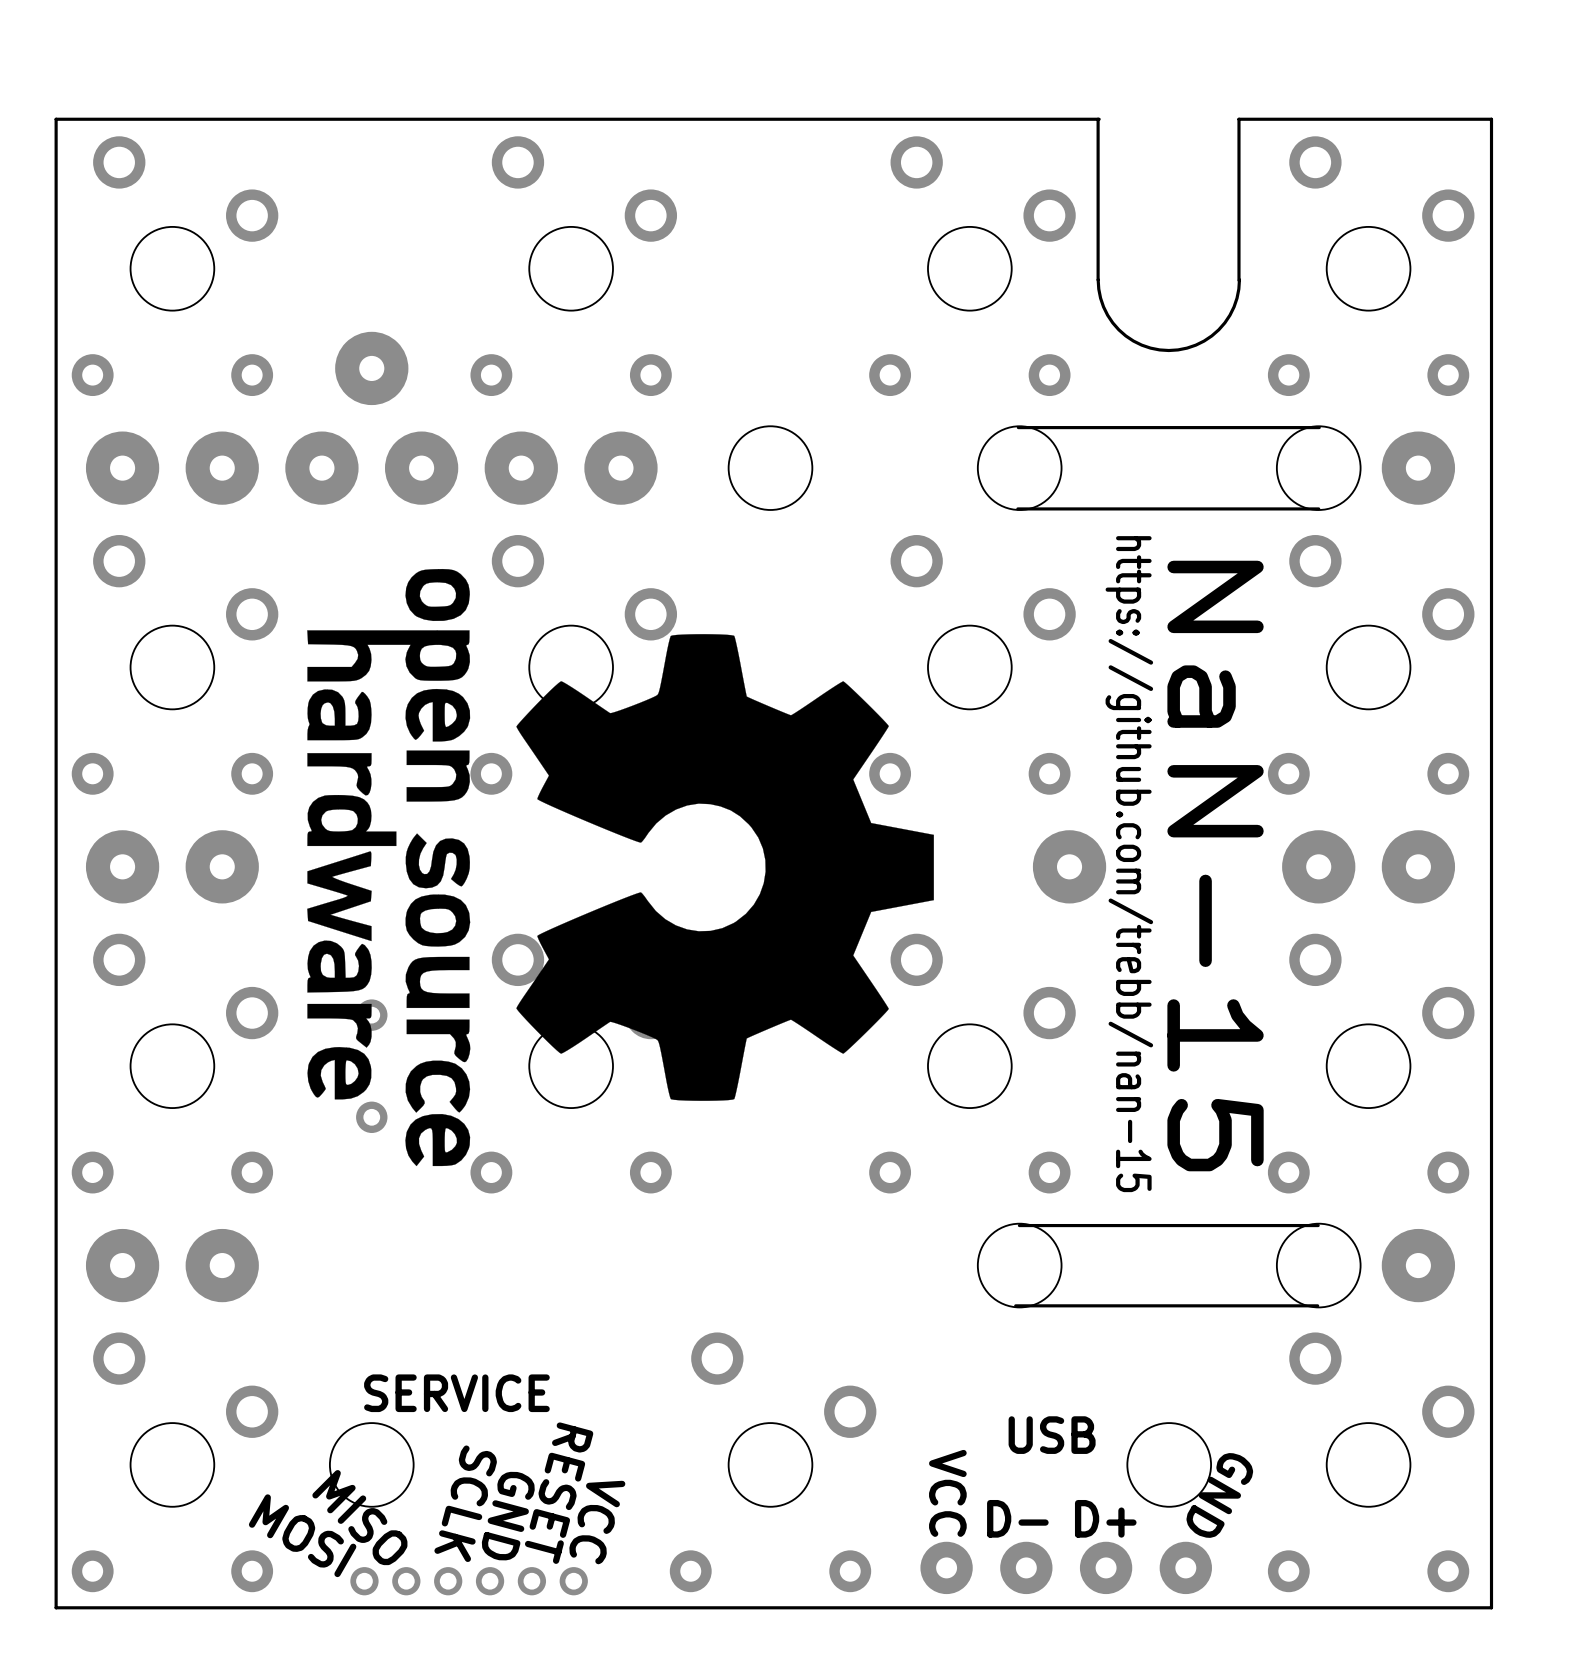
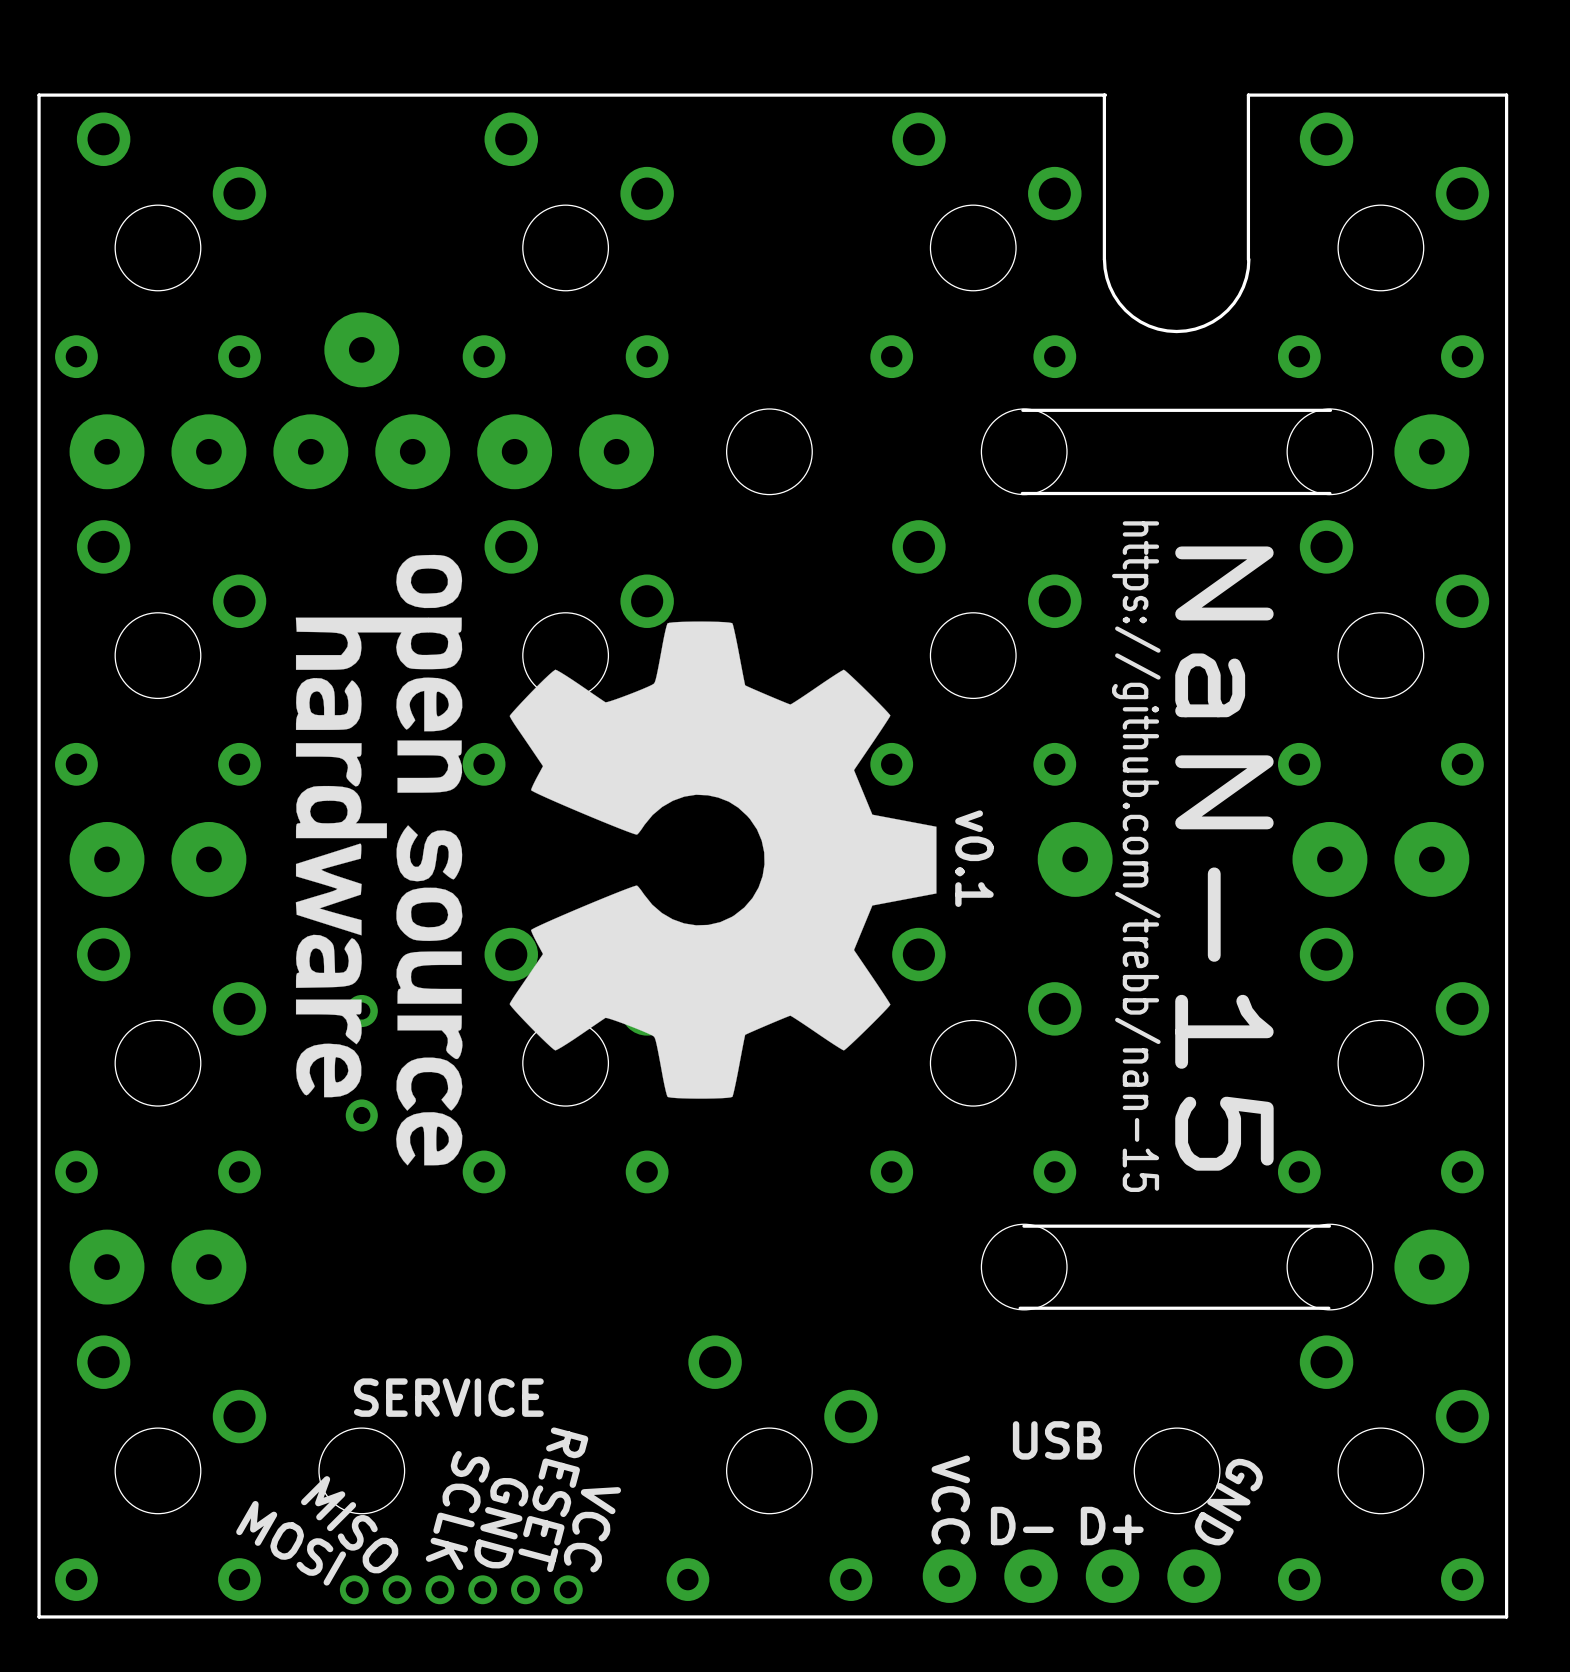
text: none -> v0.1 (974, 858)

